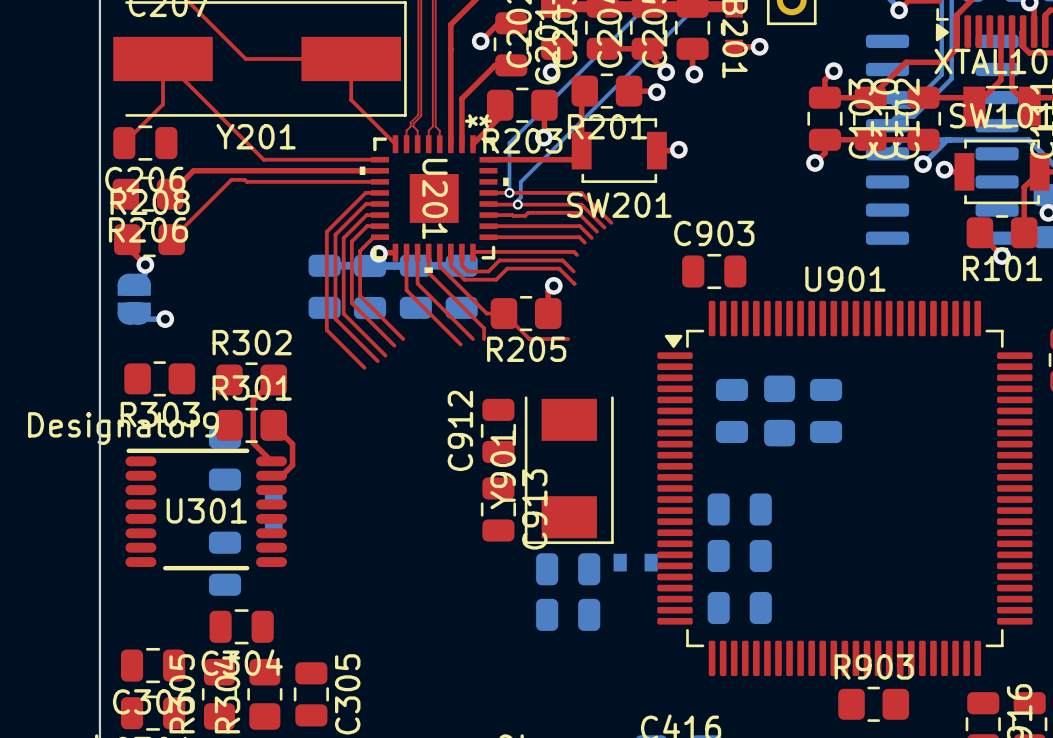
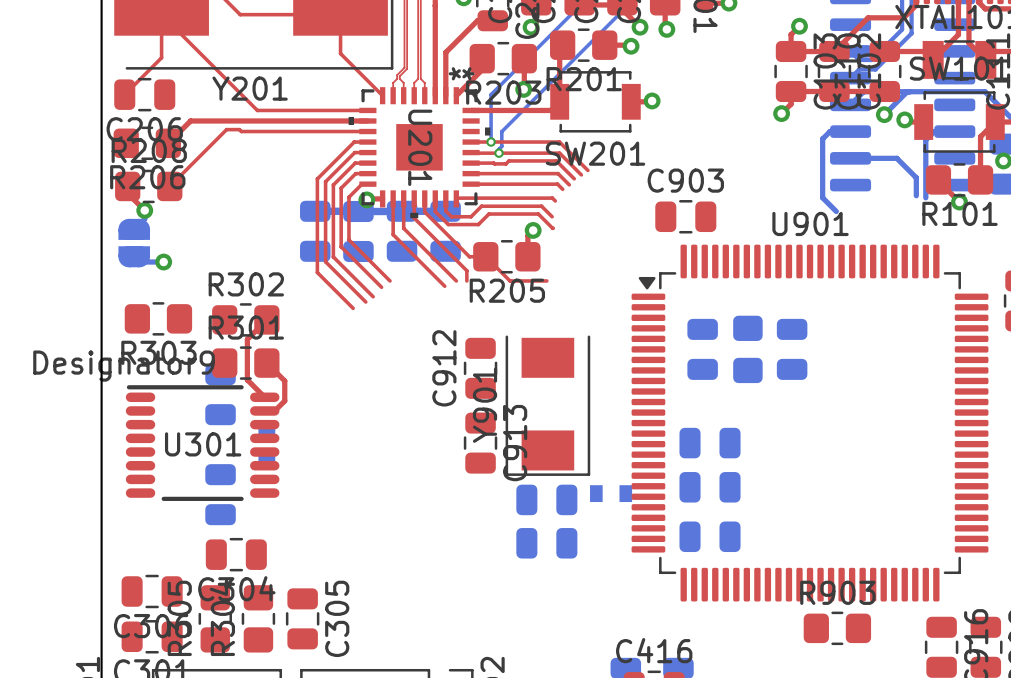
bottom track: none -> (850, 131) (830, 131) (822, 138) (822, 197) (836, 211)
bottom track: none -> (954, 131) (934, 131) (925, 140) (925, 197)
bottom track: none -> (850, 158) (896, 158) (916, 177) (916, 195)

